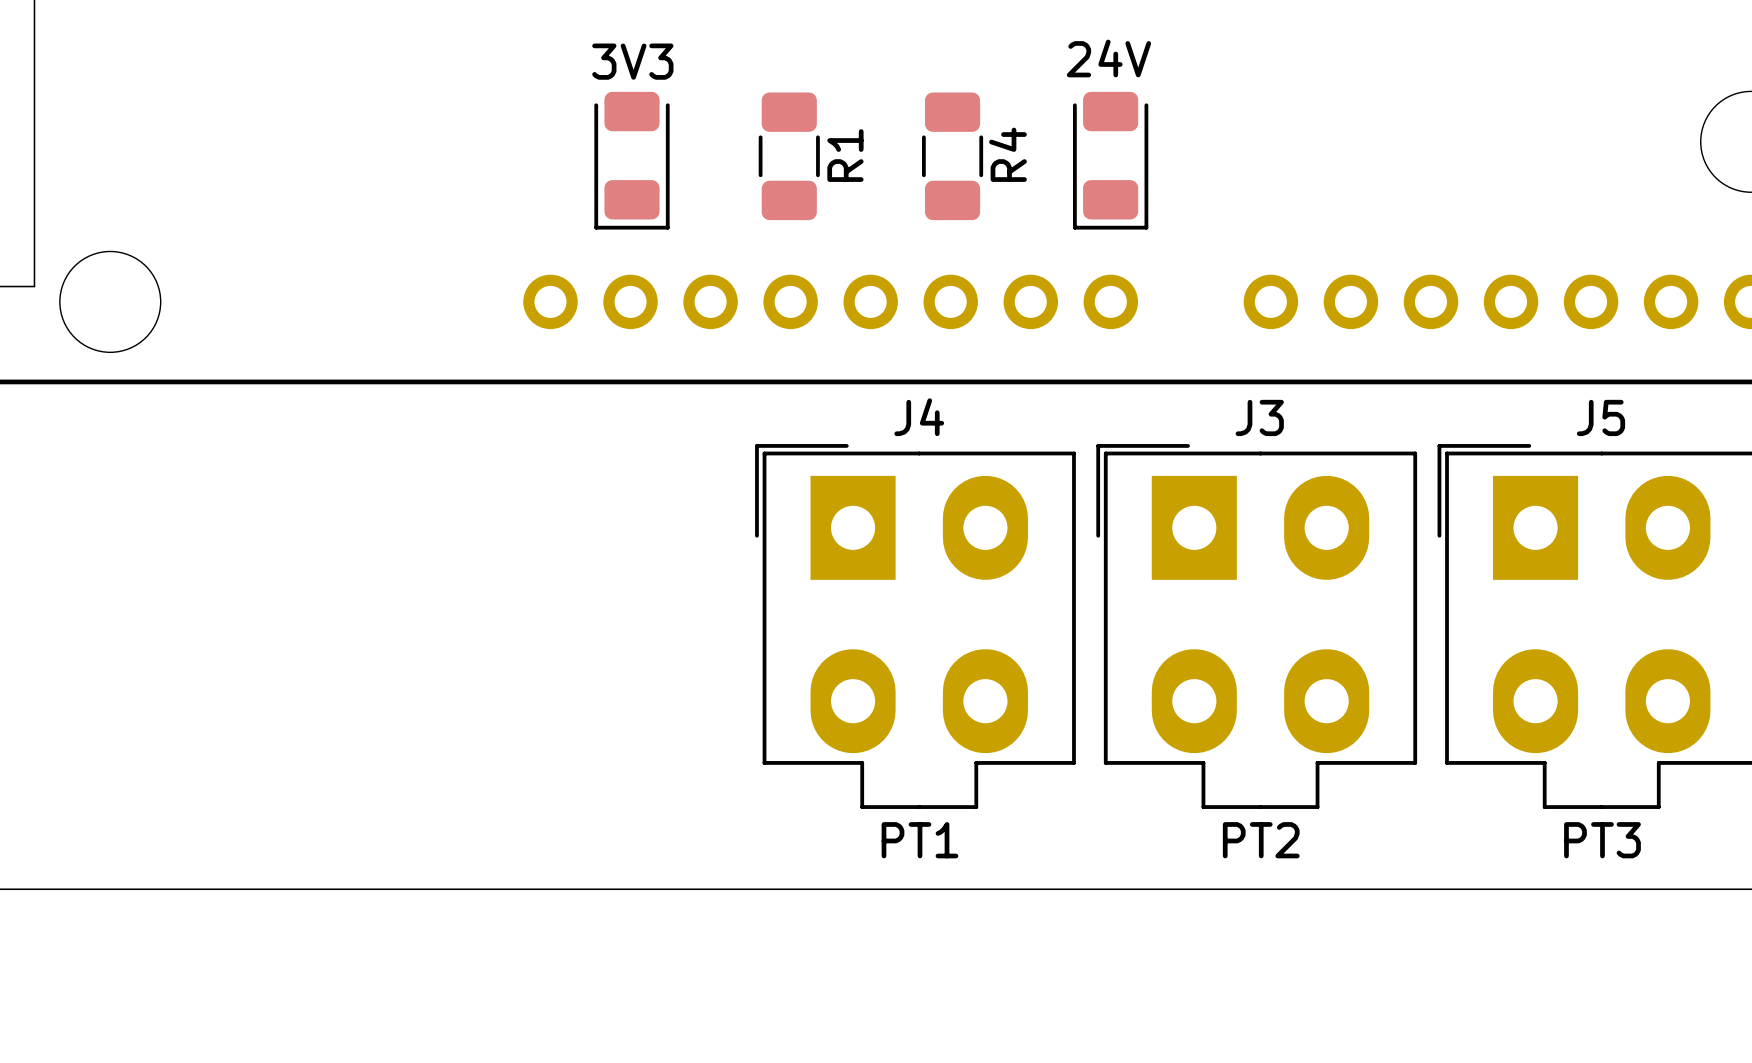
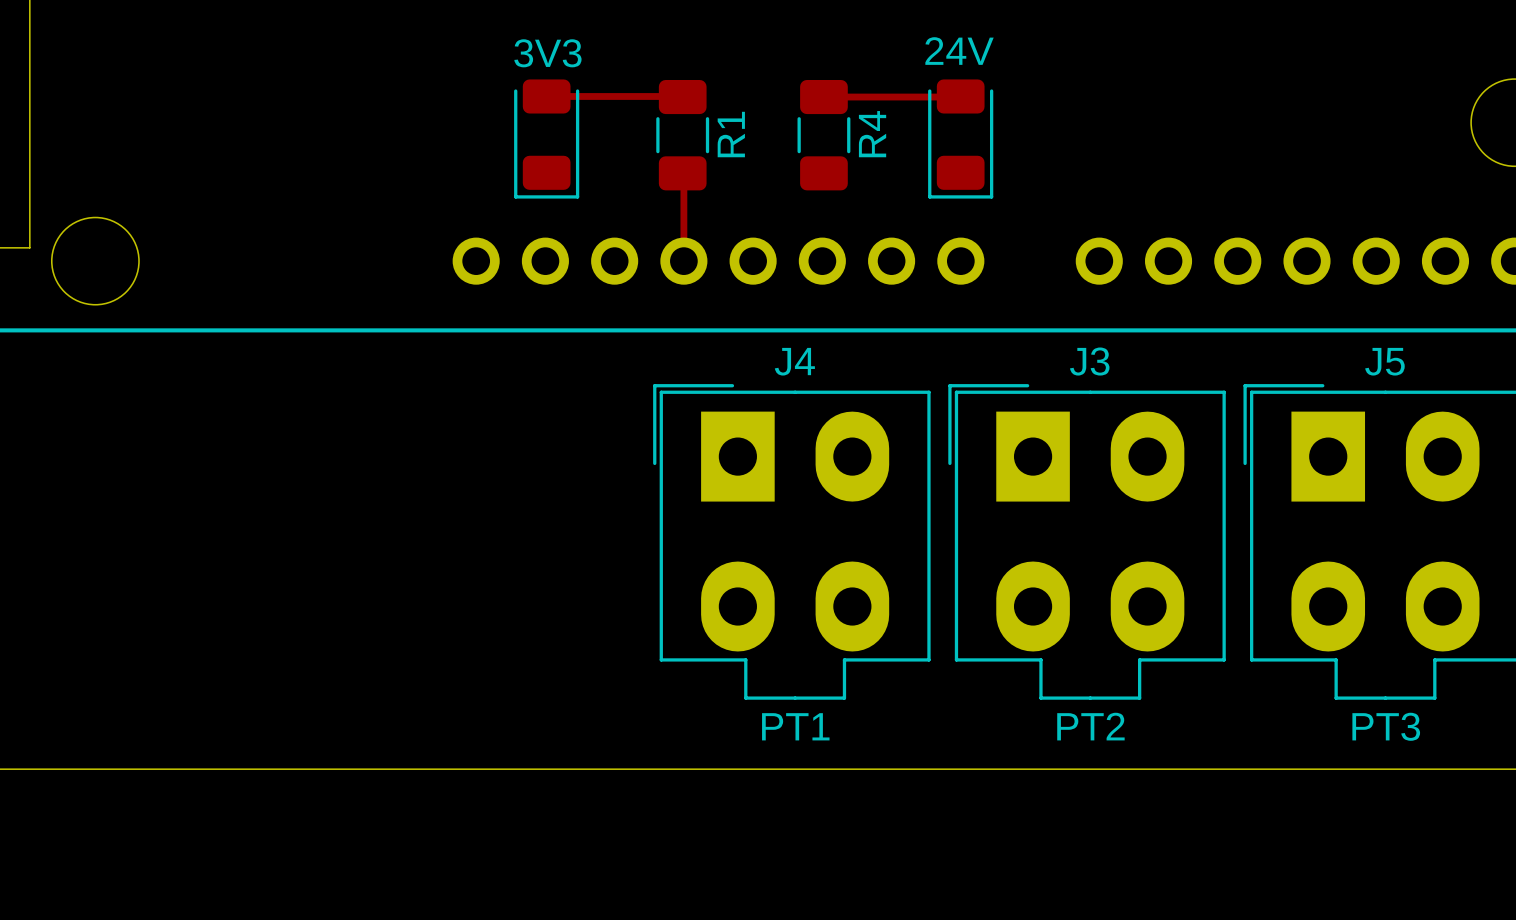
top track: none -> (546, 96) (682, 97)
top track: none -> (960, 96) (823, 97)
top track: none -> (682, 173) (683, 261)

